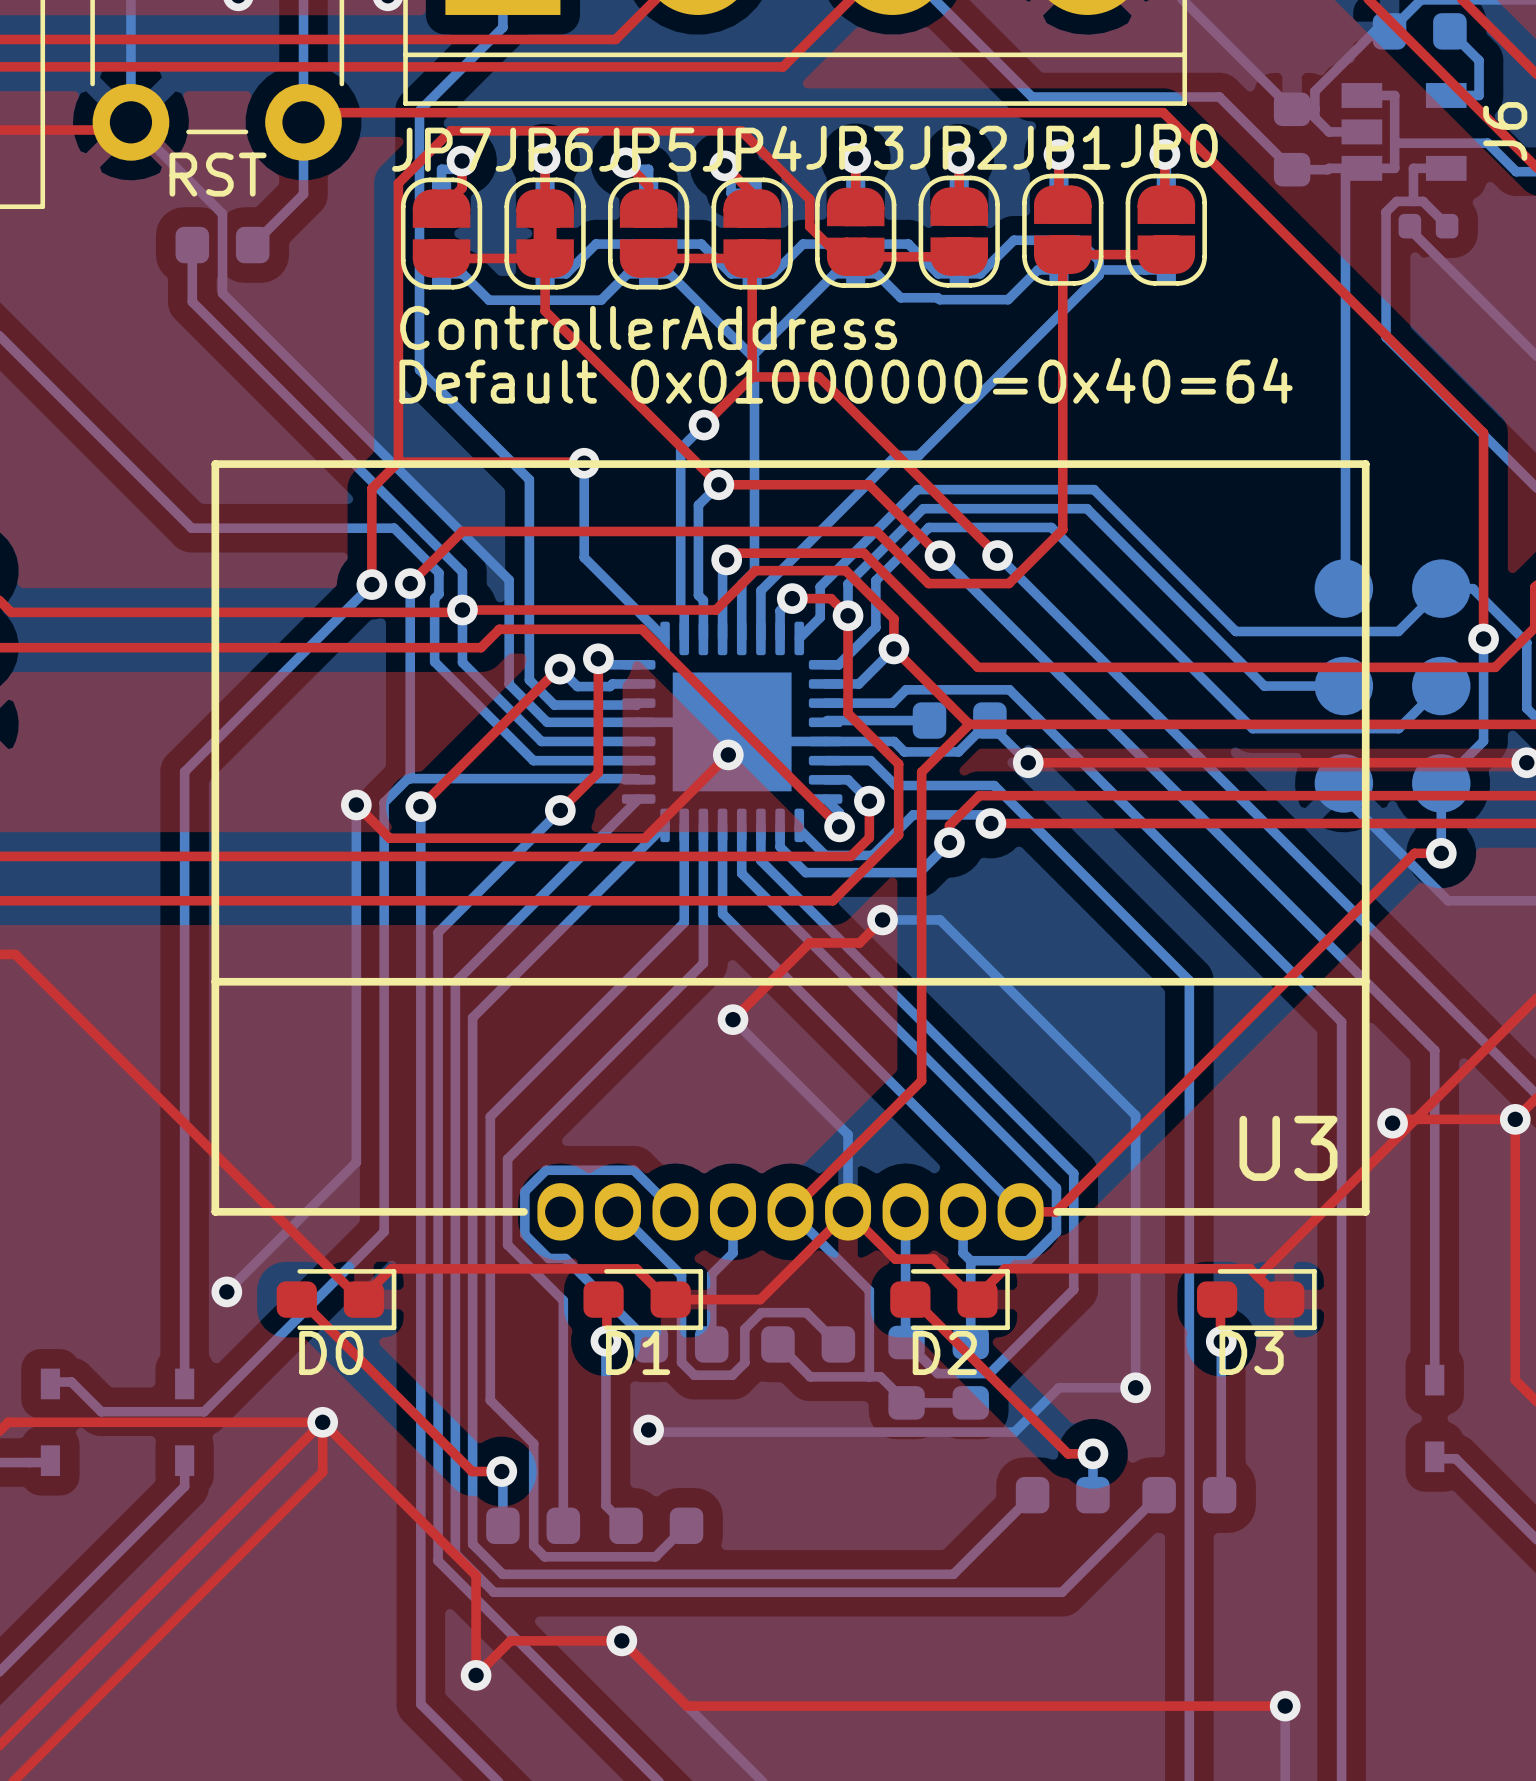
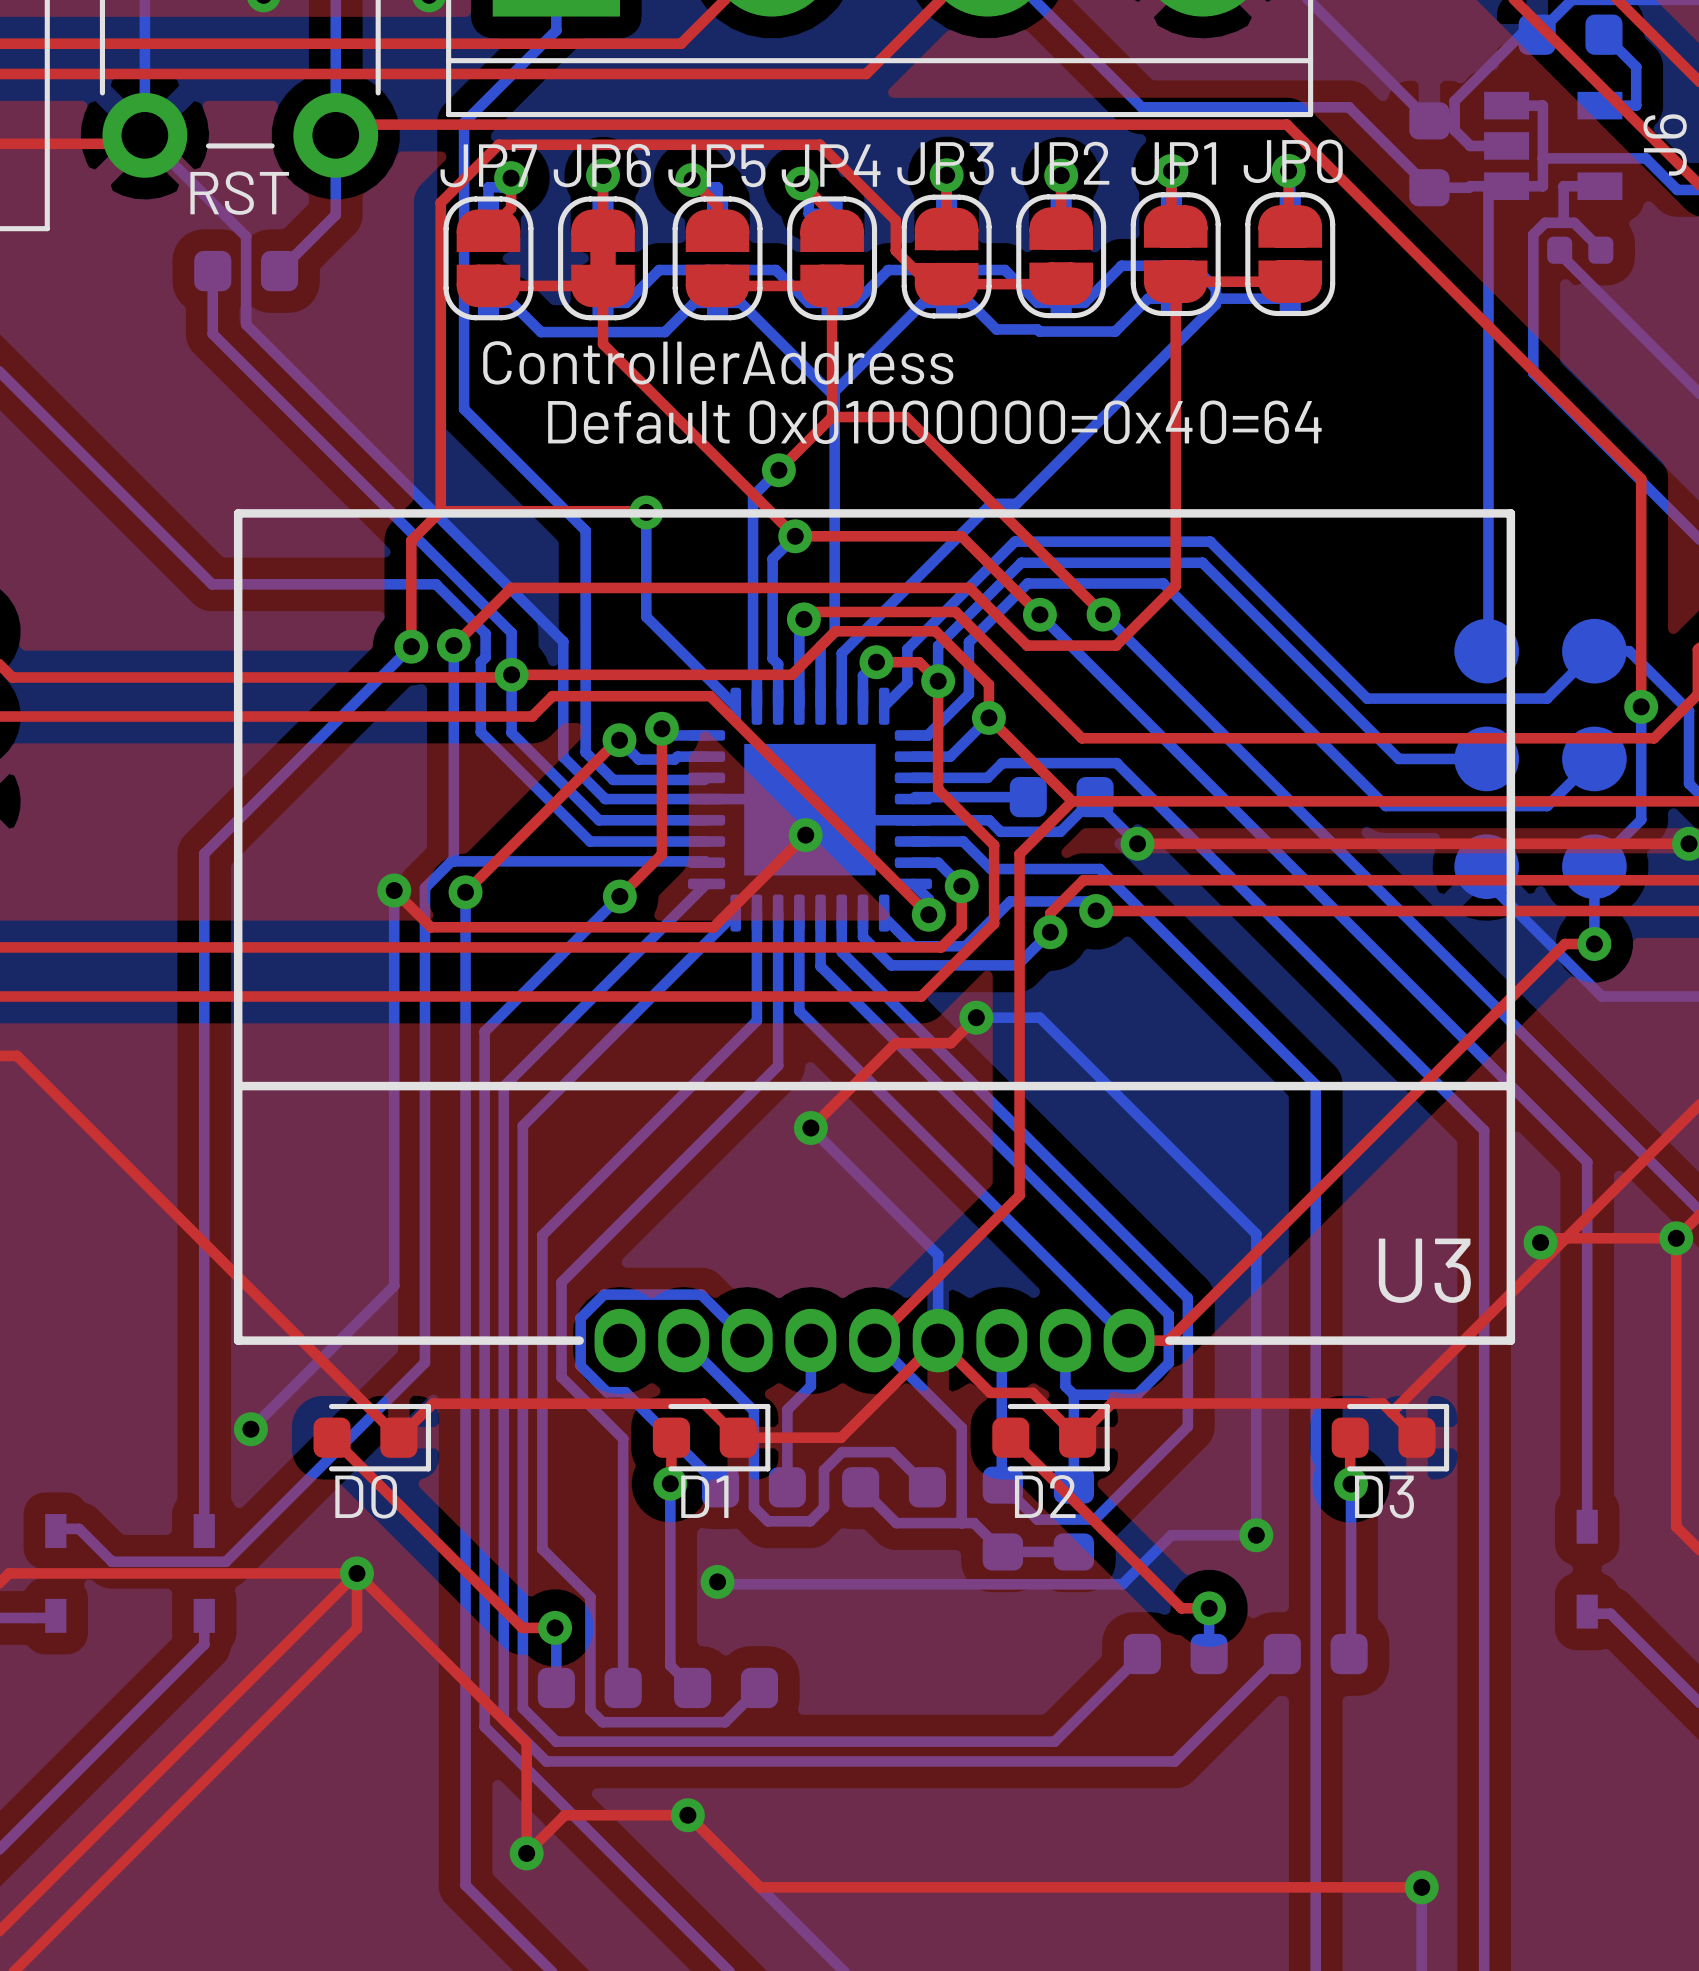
D0 footprint: [276, 1269, 397, 1331] -> [313, 1403, 432, 1472]
D1 footprint: [583, 1269, 704, 1331] -> [652, 1403, 771, 1472]
D2 footprint: [890, 1269, 1010, 1331] -> [992, 1403, 1110, 1472]
D3 footprint: [1197, 1269, 1317, 1331] -> [1331, 1403, 1450, 1472]

